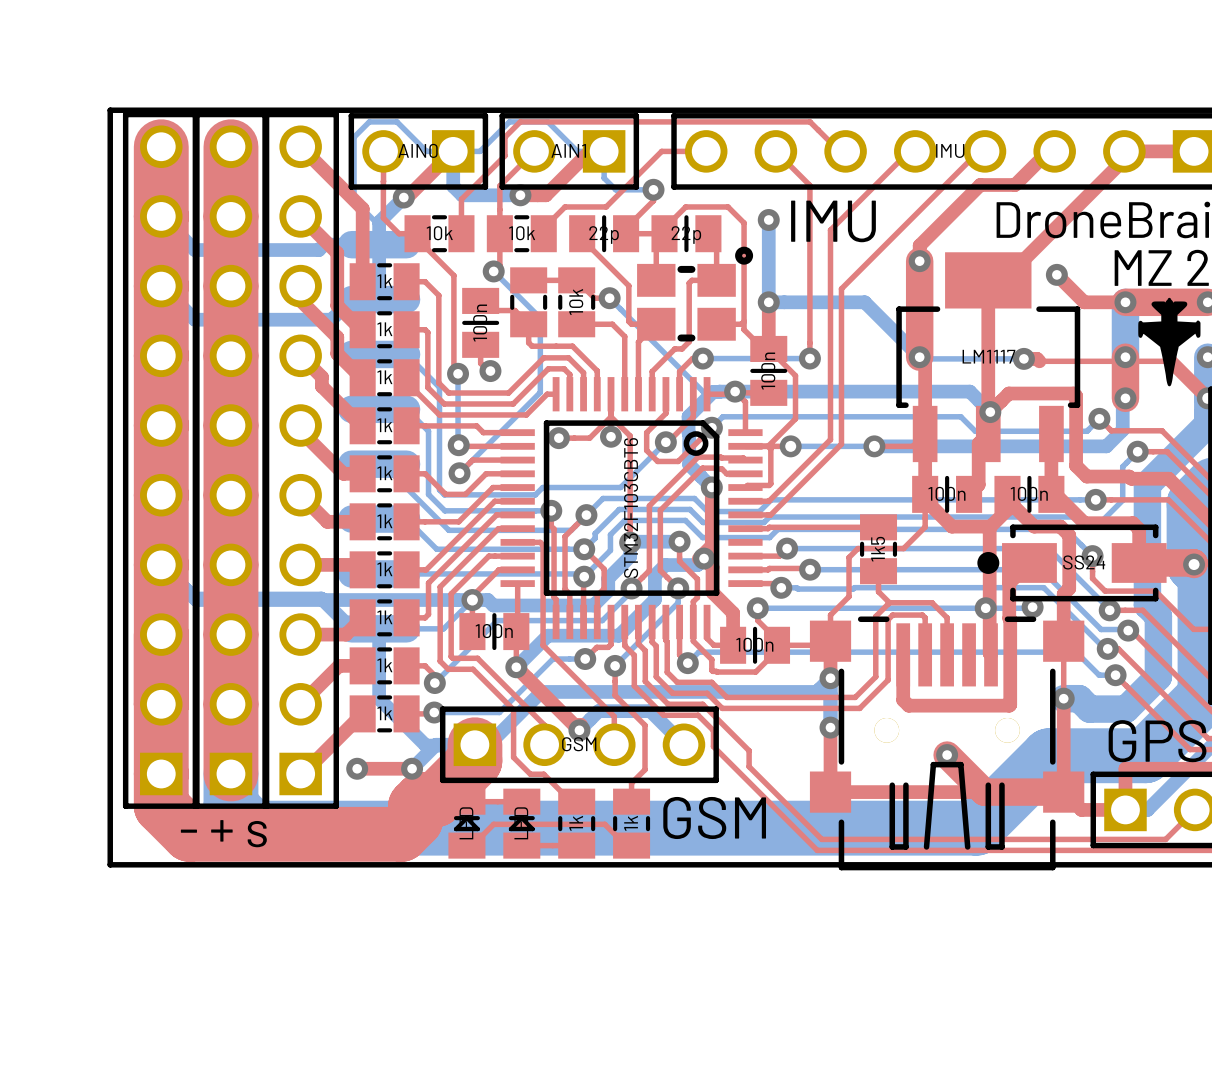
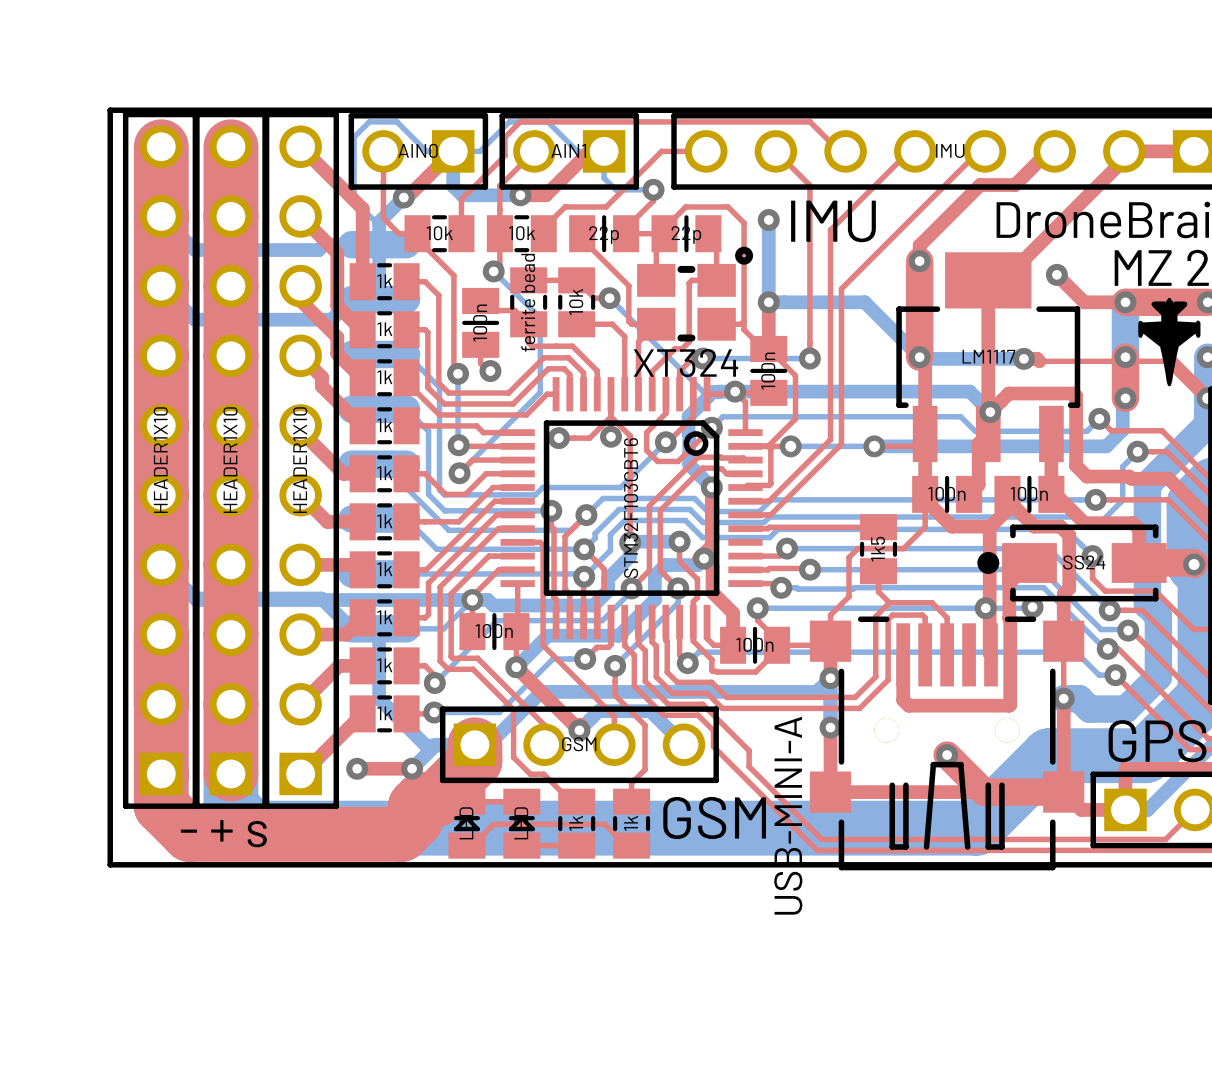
part value: none -> ferrite bead (528, 302)
bottom track width: thin (921, 358) (1023, 358) -> thick (921, 358) (1023, 358)
part value: none -> XT324 (685, 363)
part value: none -> HEADER1X10 (160, 460)
part value: none -> HEADER1X10 (230, 460)
part value: none -> HEADER1X10 (300, 460)
part value: none -> USB-MINI-A (788, 815)

